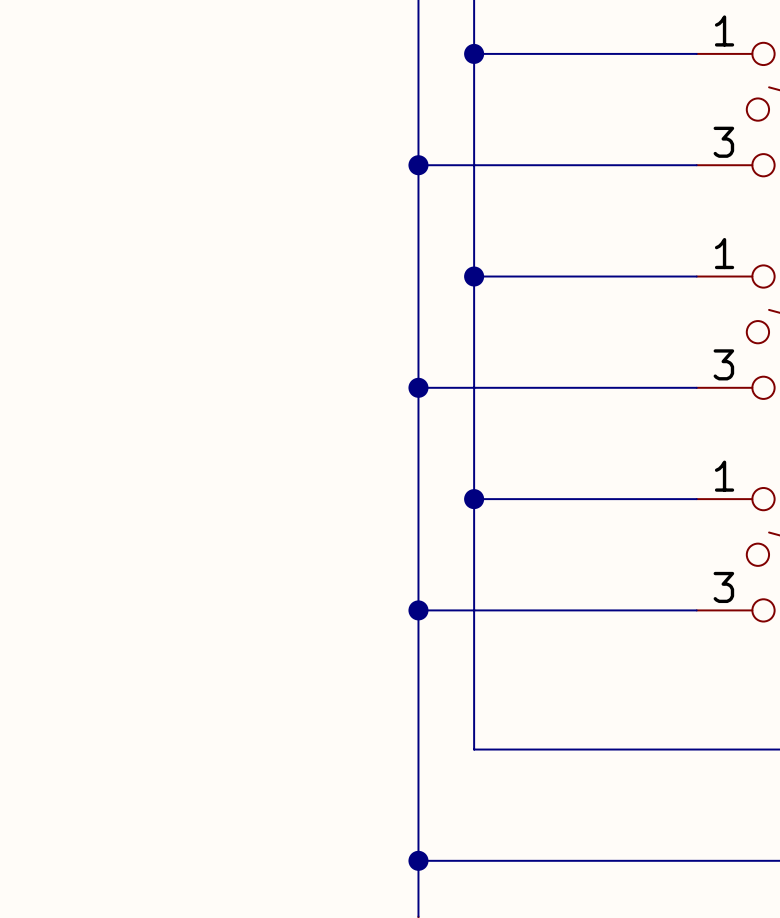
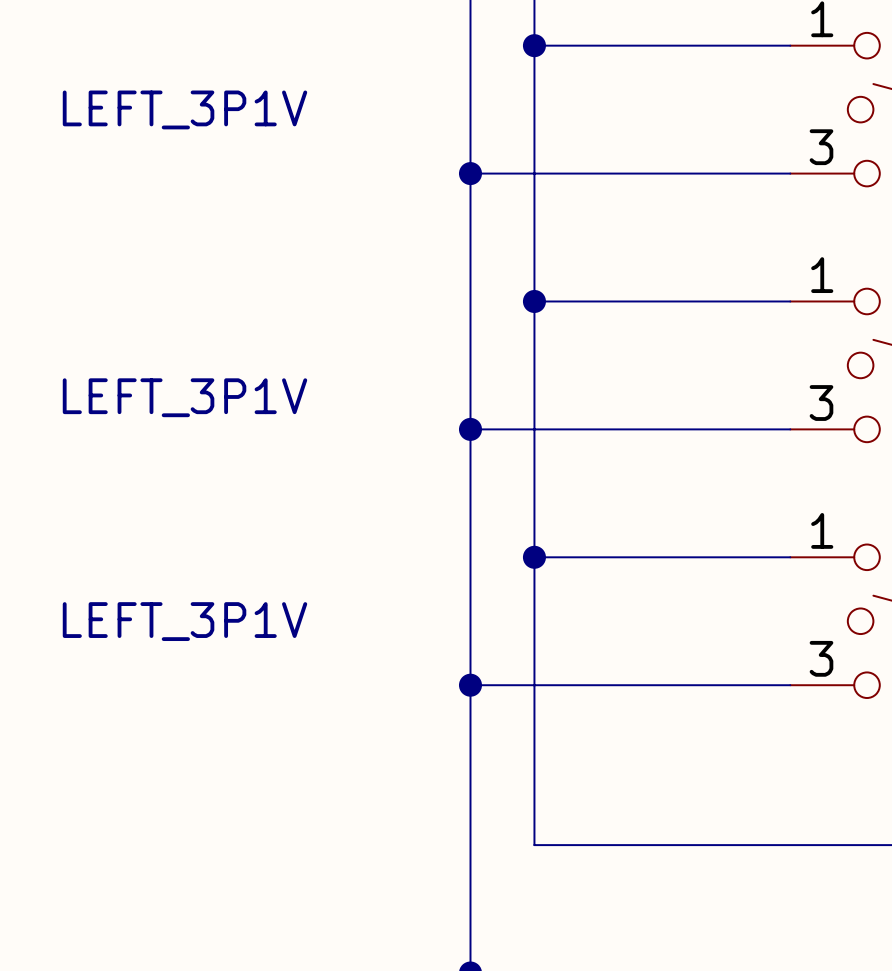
part value: none -> LEFT_3P1V (184, 109)
part value: none -> LEFT_3P1V (184, 397)
part value: none -> LEFT_3P1V (184, 621)

